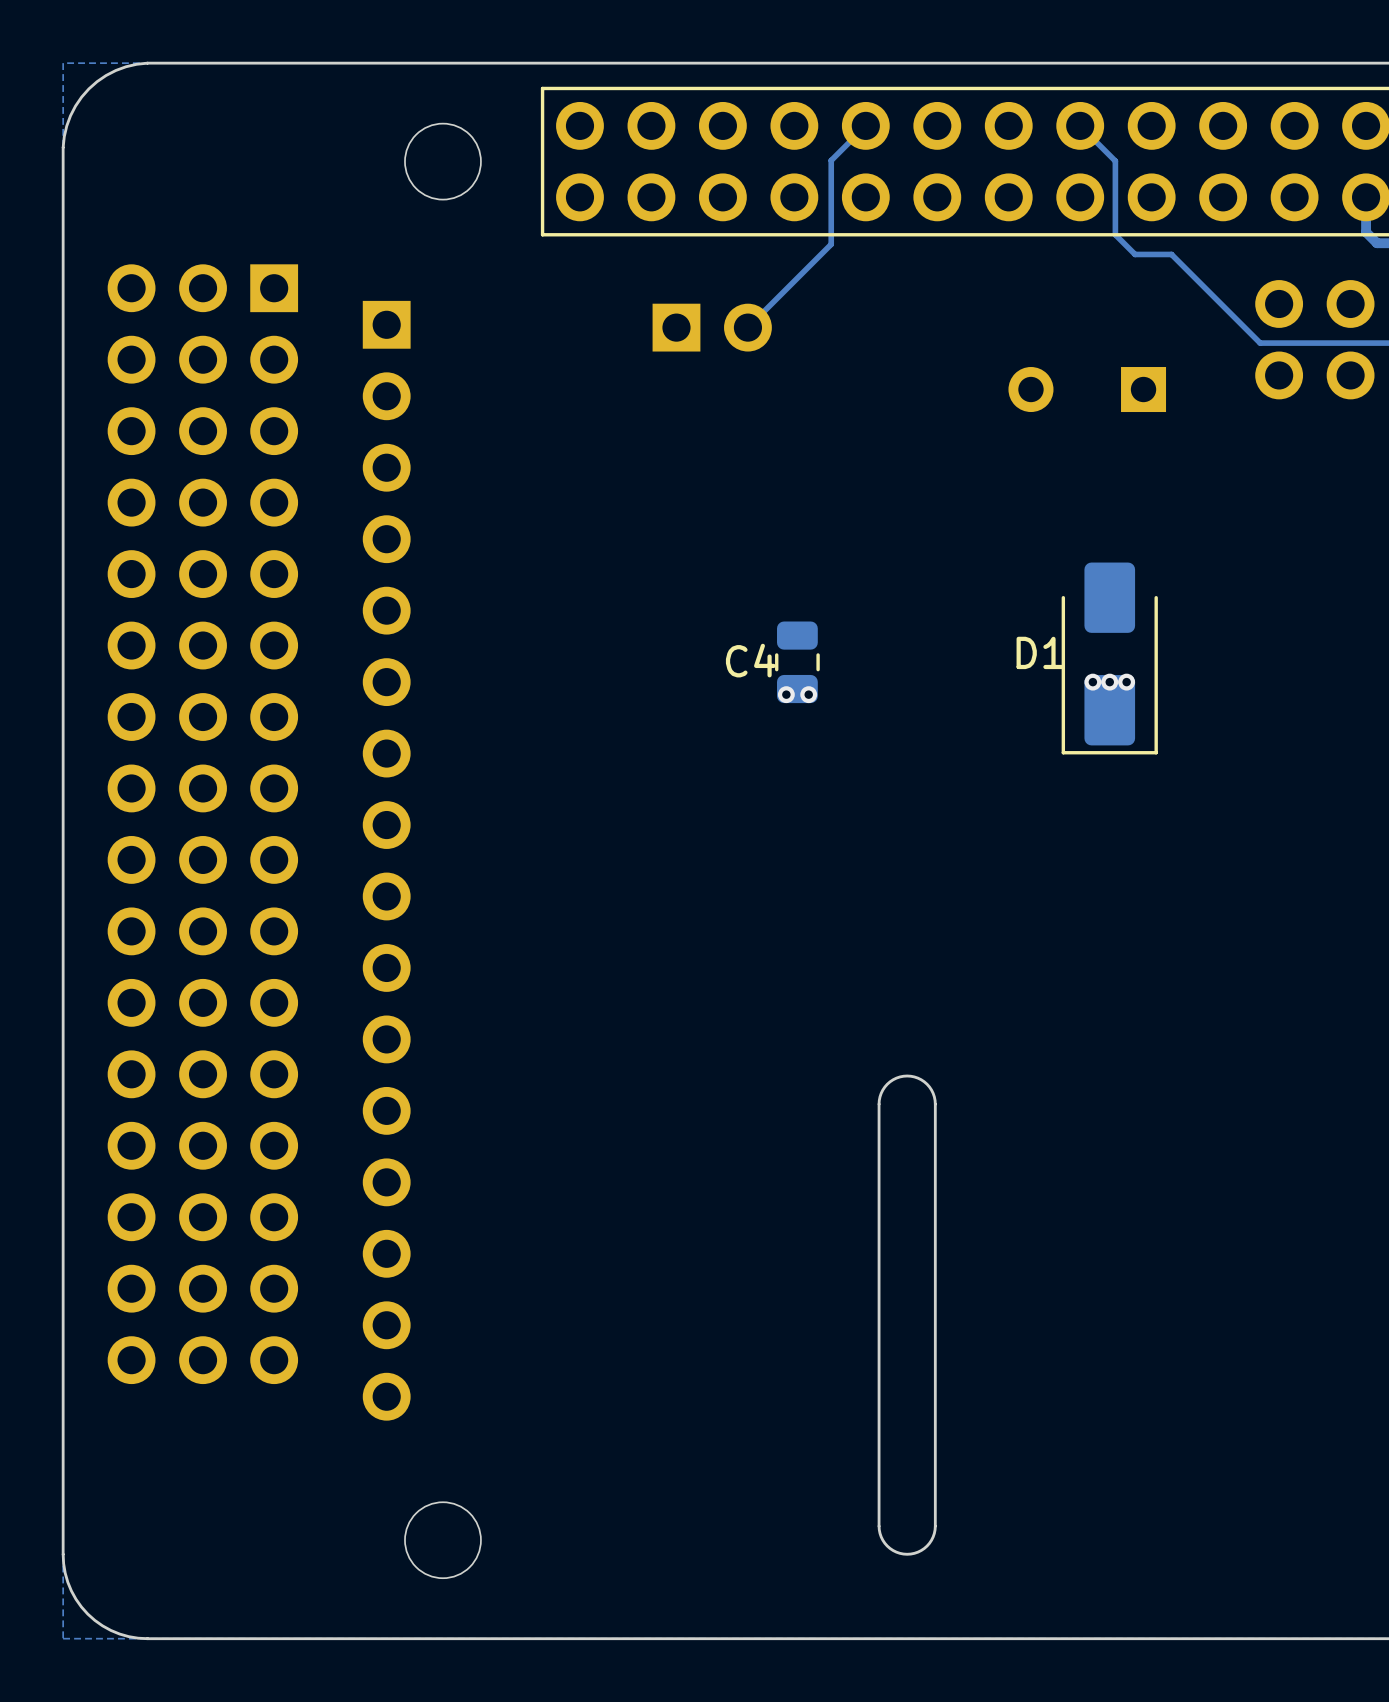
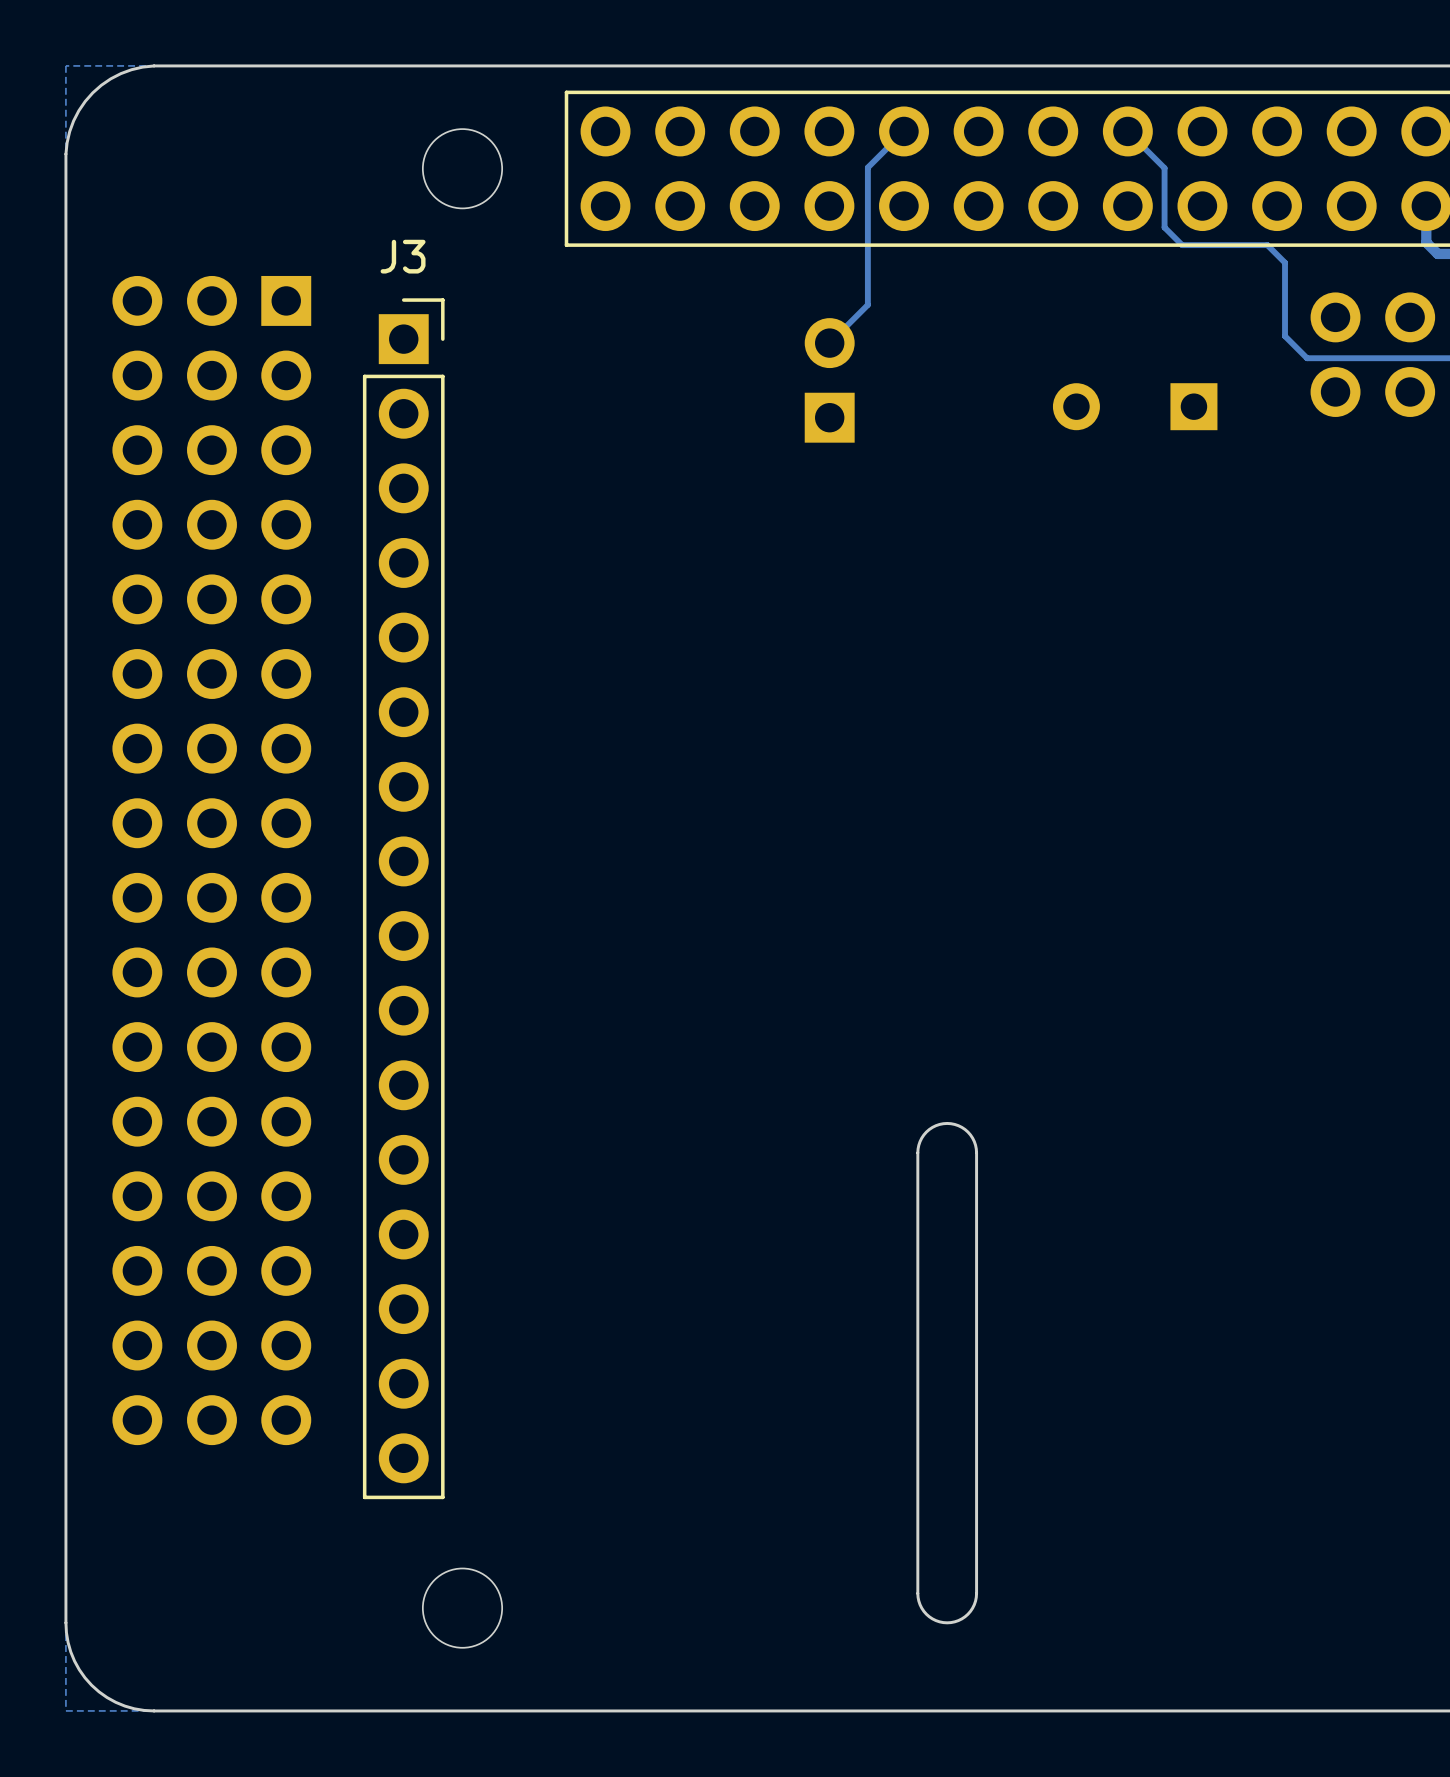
track: (1115, 217) (1115, 234) (1135, 254) (1171, 254) (1260, 343) -> (1164, 227) (1182, 245) (1267, 245) (1285, 262) (1285, 336) (1307, 358) (1315, 358)
track: (831, 244) (747, 327) -> (867, 255) (867, 304) (829, 343)
part rotation: 0° (712, 327) -> 90° counterclockwise (829, 380)
part position: (712, 327) -> (829, 380)
D1: (1109, 658) -> none
C4: (797, 662) -> none
via: (1092, 682) -> none
via: (1109, 682) -> none
via: (1126, 682) -> none
via: (786, 694) -> none
via: (808, 694) -> none
J3 side: top (386, 860) -> bottom (403, 898)

